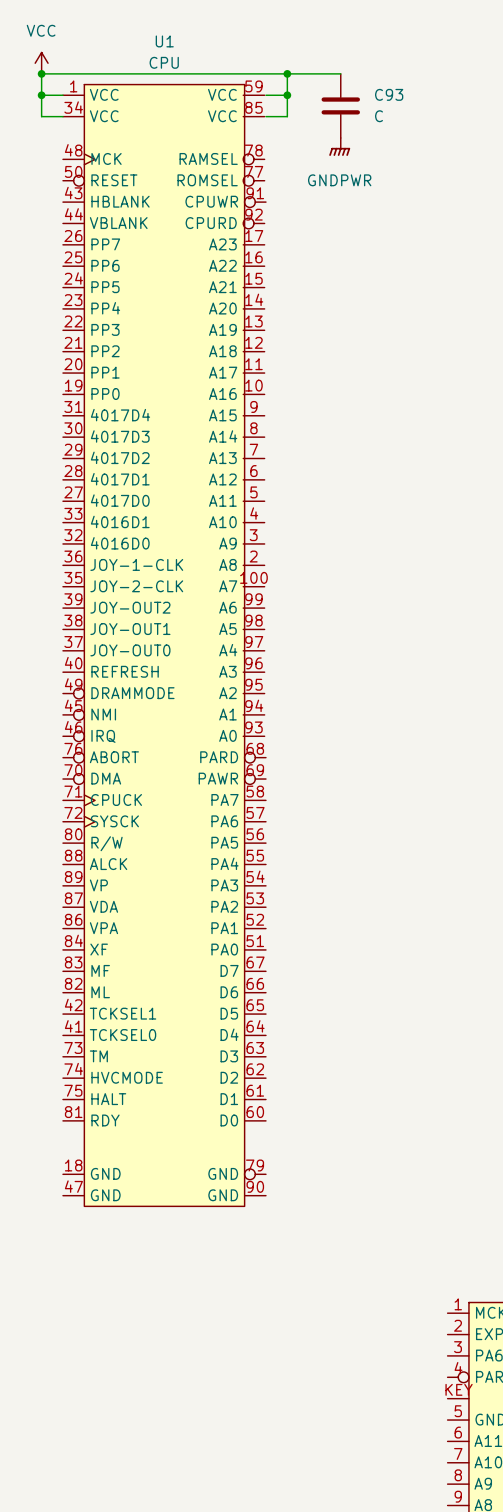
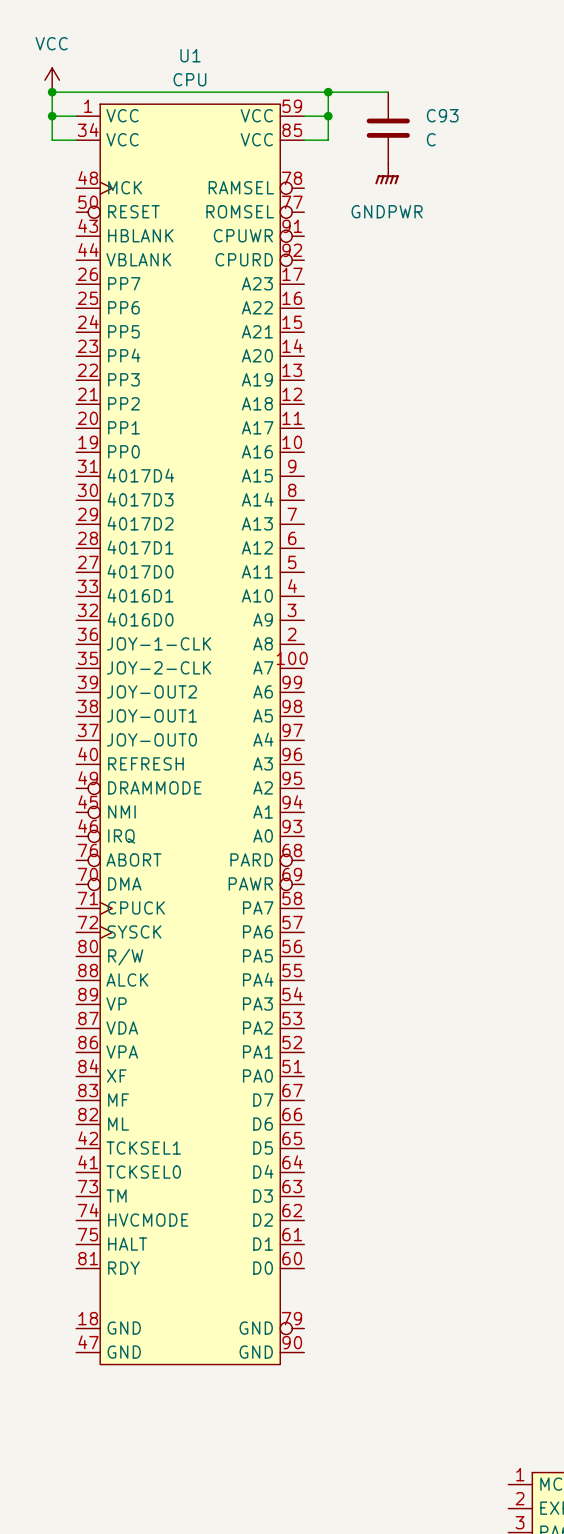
U1 symbol: [62, 84, 266, 1207] -> [76, 104, 305, 1365]

